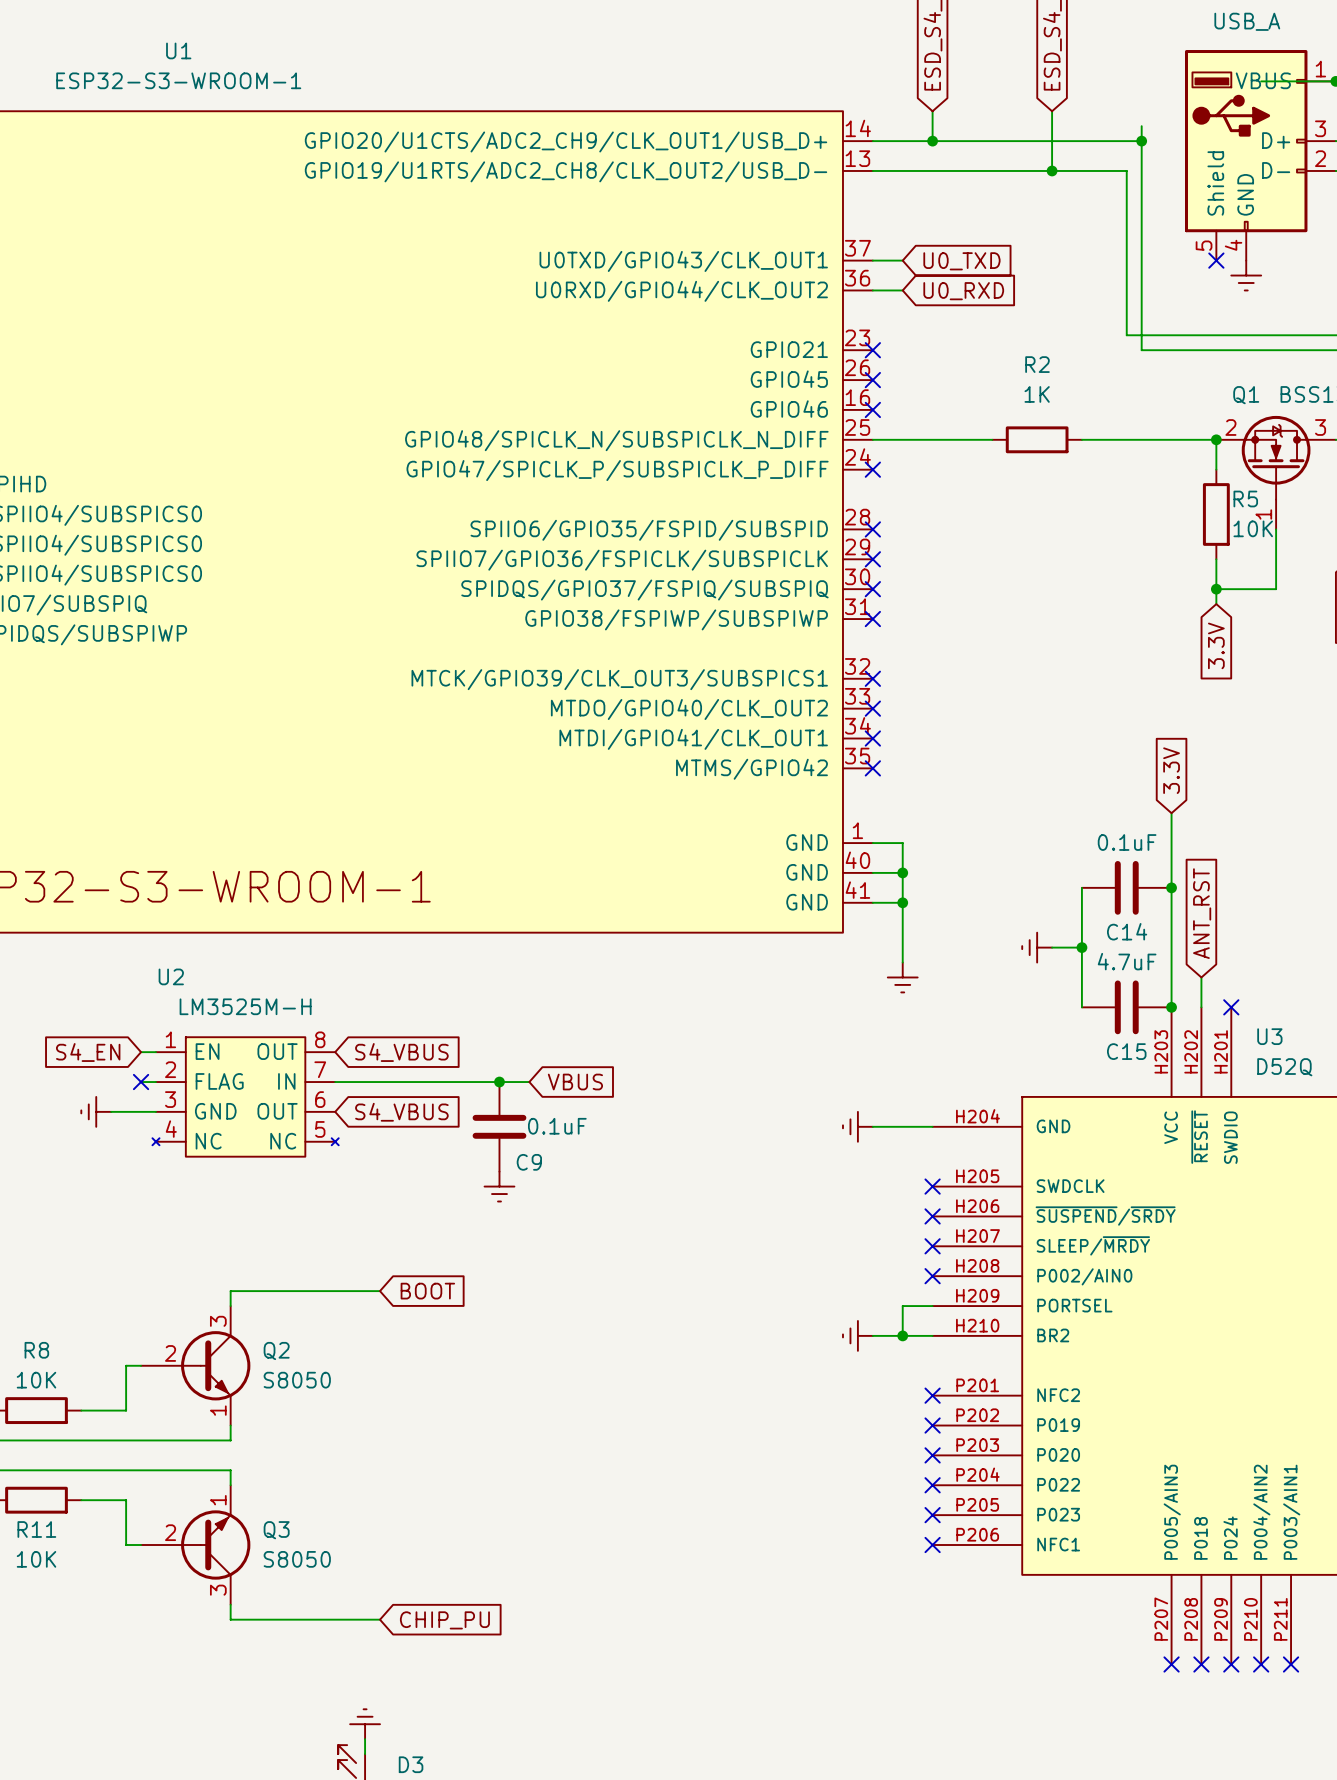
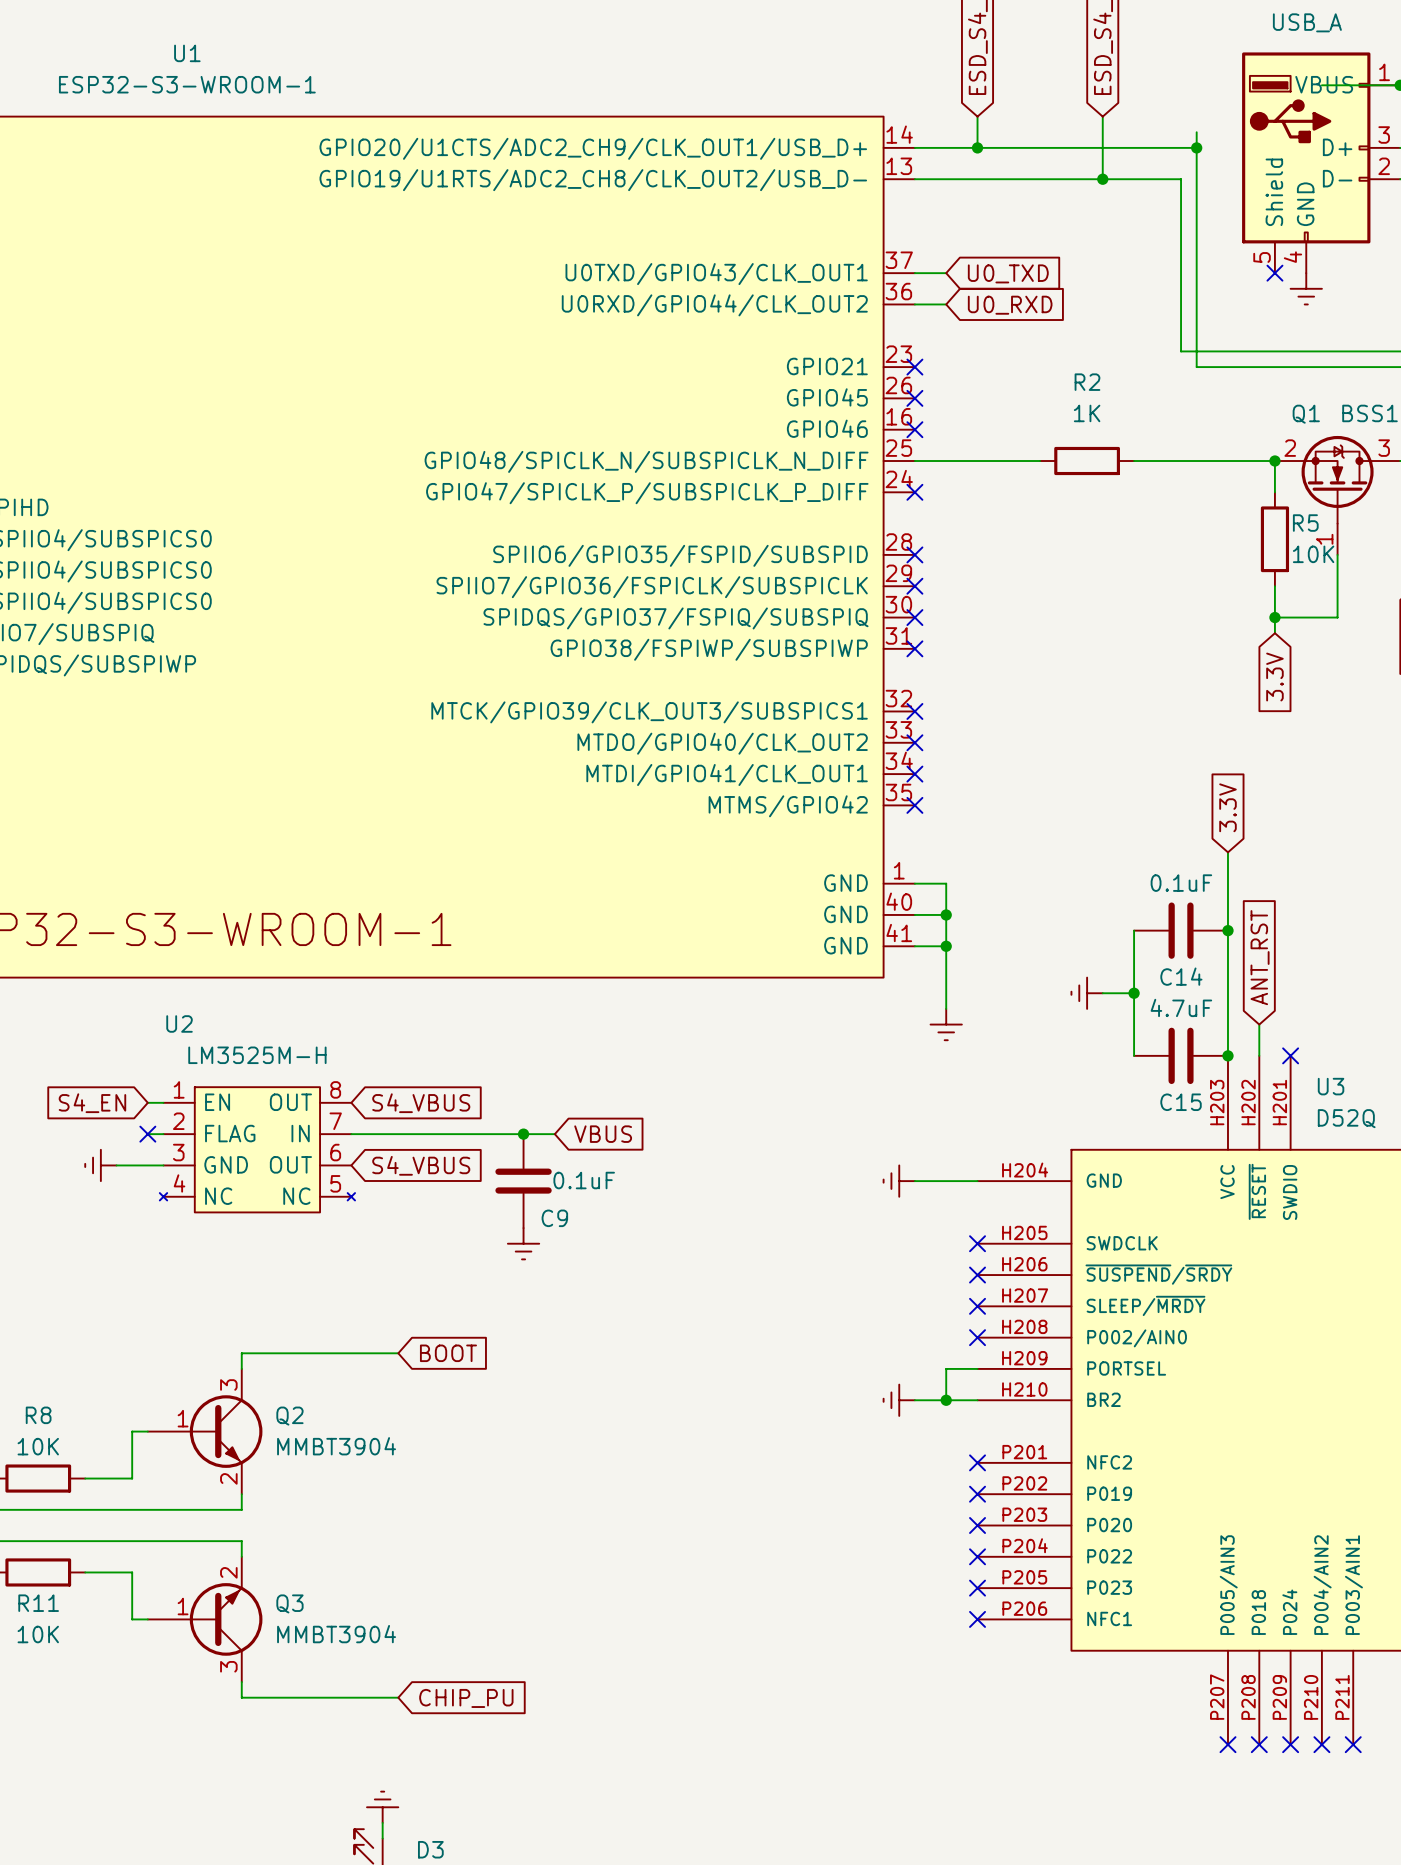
Q2 symbol: [141, 1306, 251, 1426] -> [147, 1368, 263, 1495]
Q2 value: S8050 (297, 1380) -> MMBT3904 (336, 1446)
Q3 symbol: [141, 1485, 251, 1605] -> [147, 1556, 263, 1683]
Q3 value: S8050 (297, 1559) -> MMBT3904 (336, 1634)

